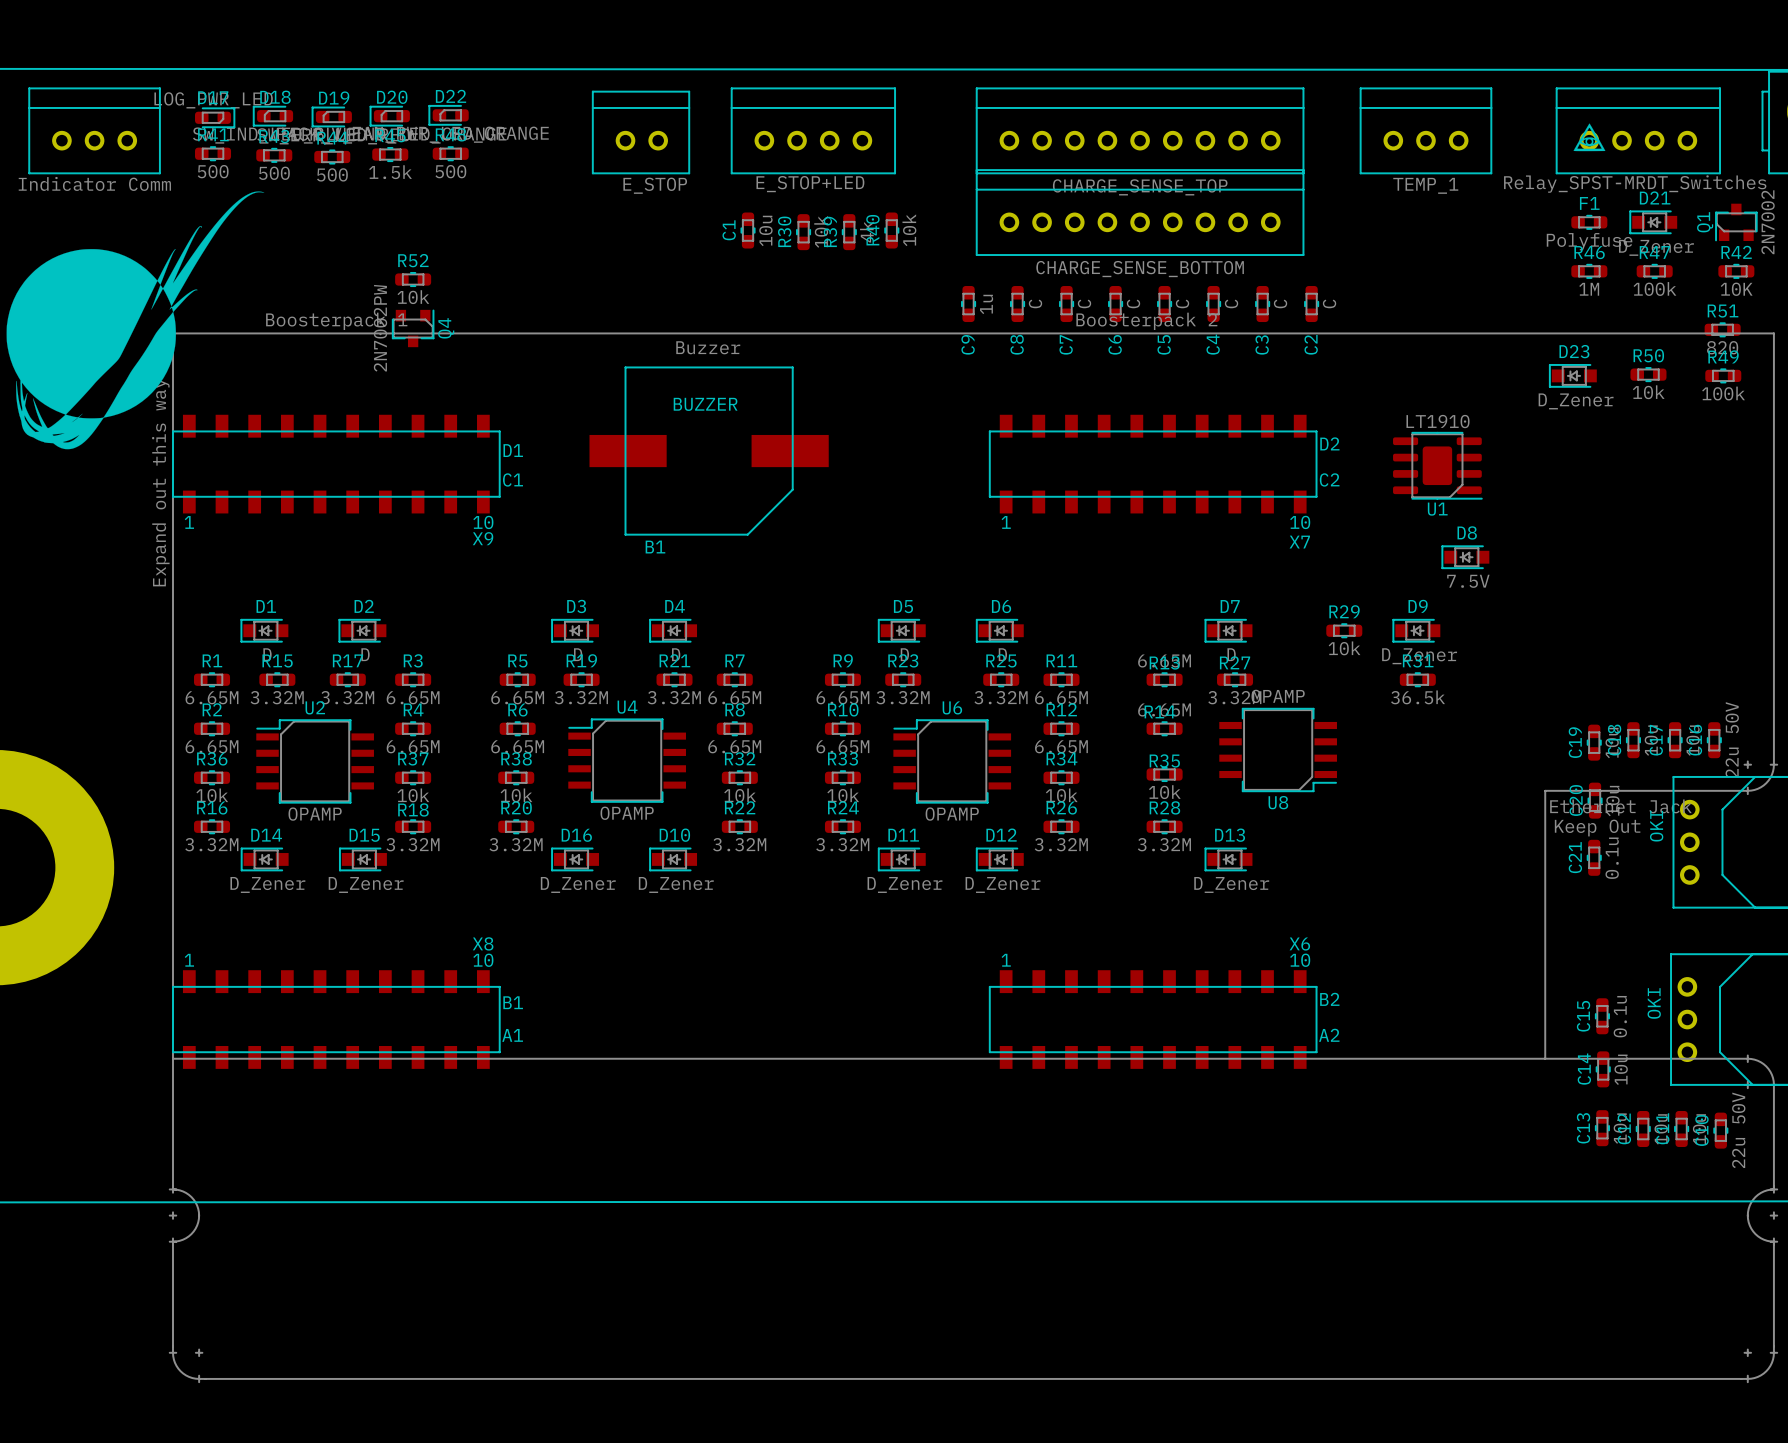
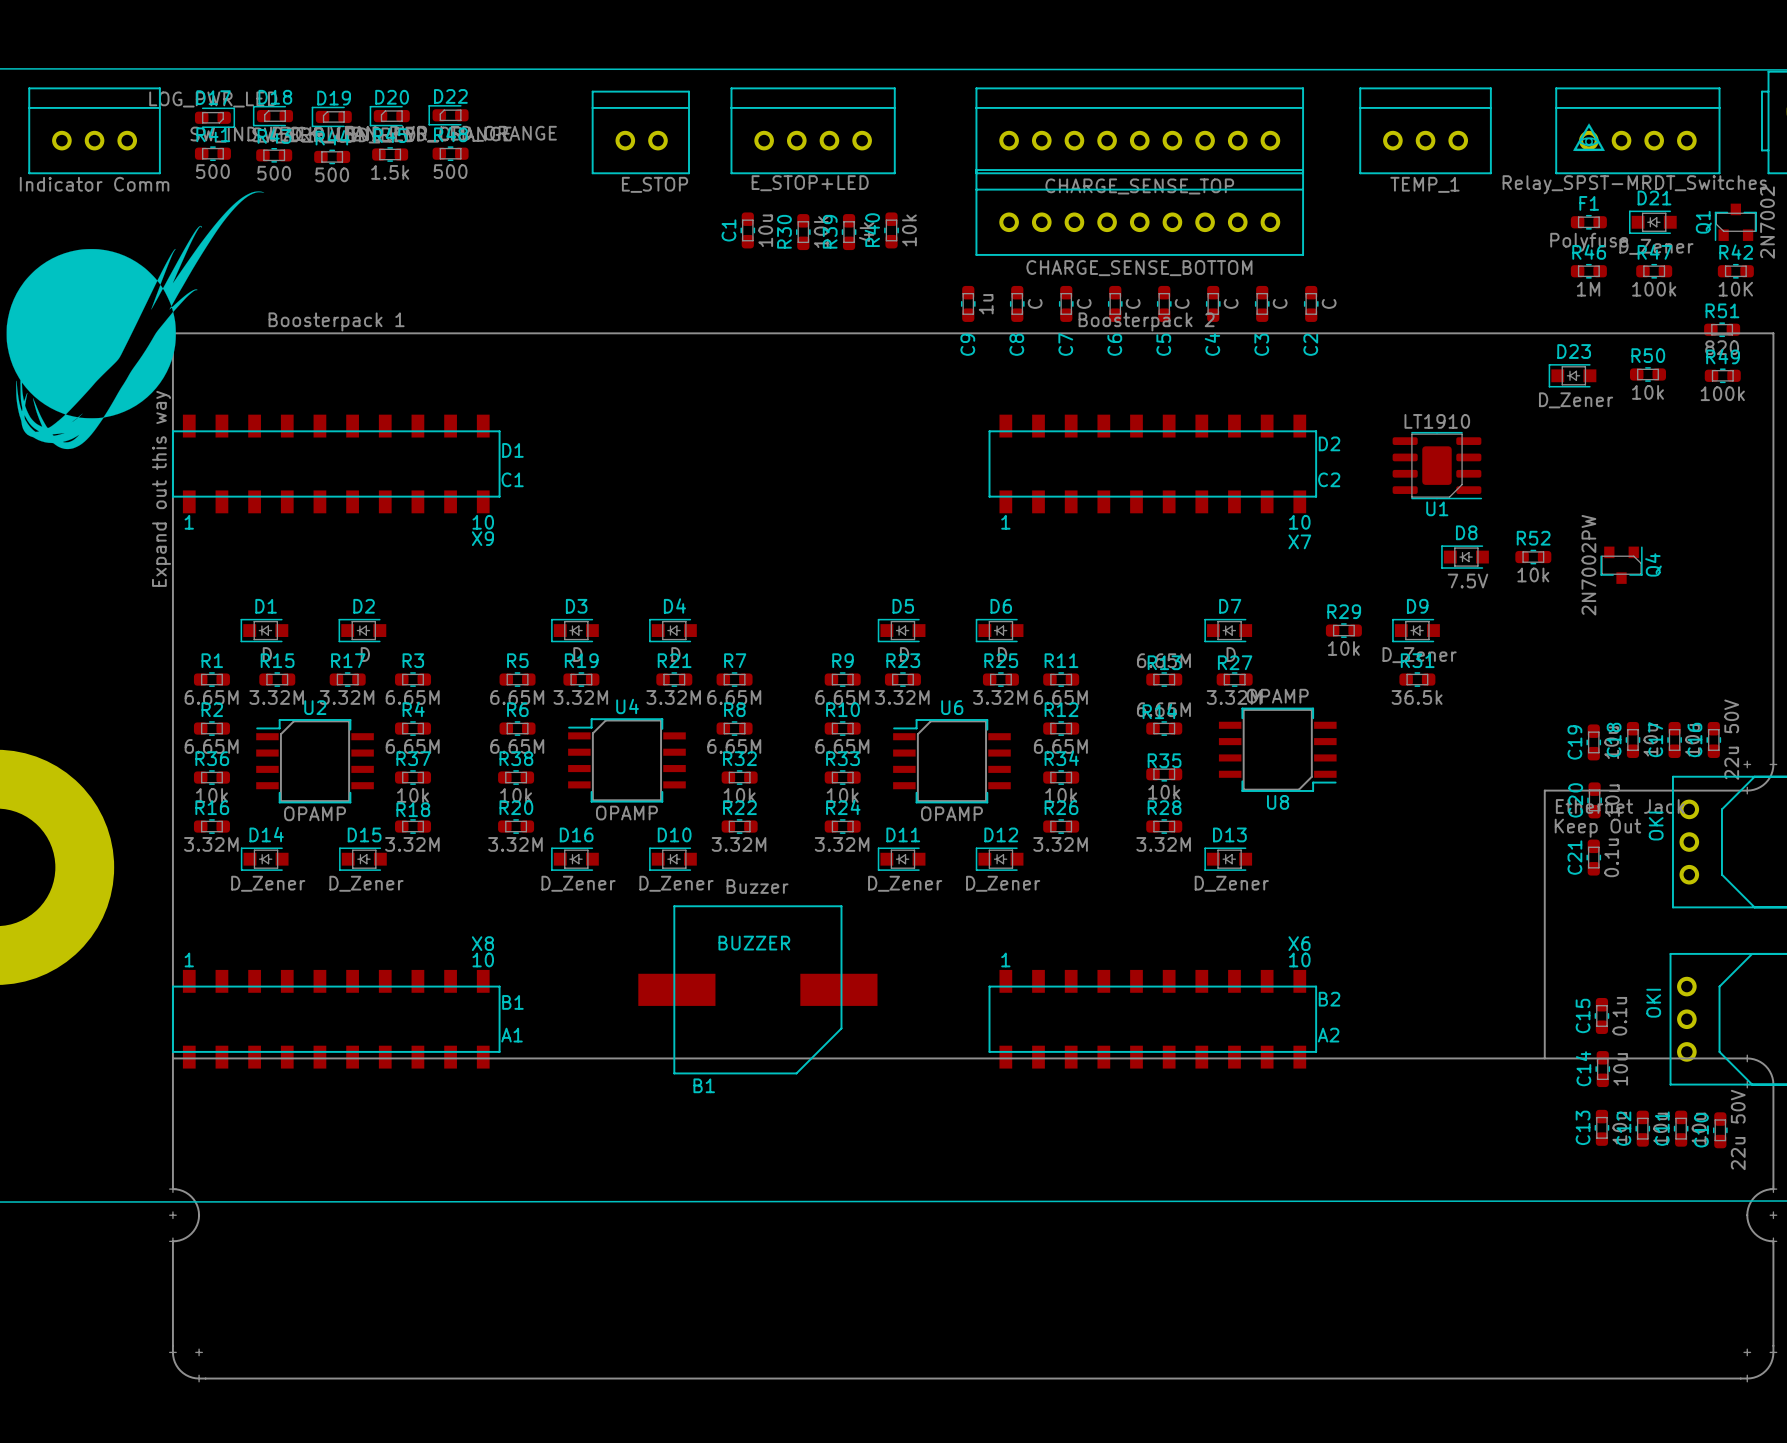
R52 position: (413, 279) -> (1533, 557)
Q4 position: (413, 328) -> (1621, 565)
B1 position: (709, 451) -> (757, 989)

